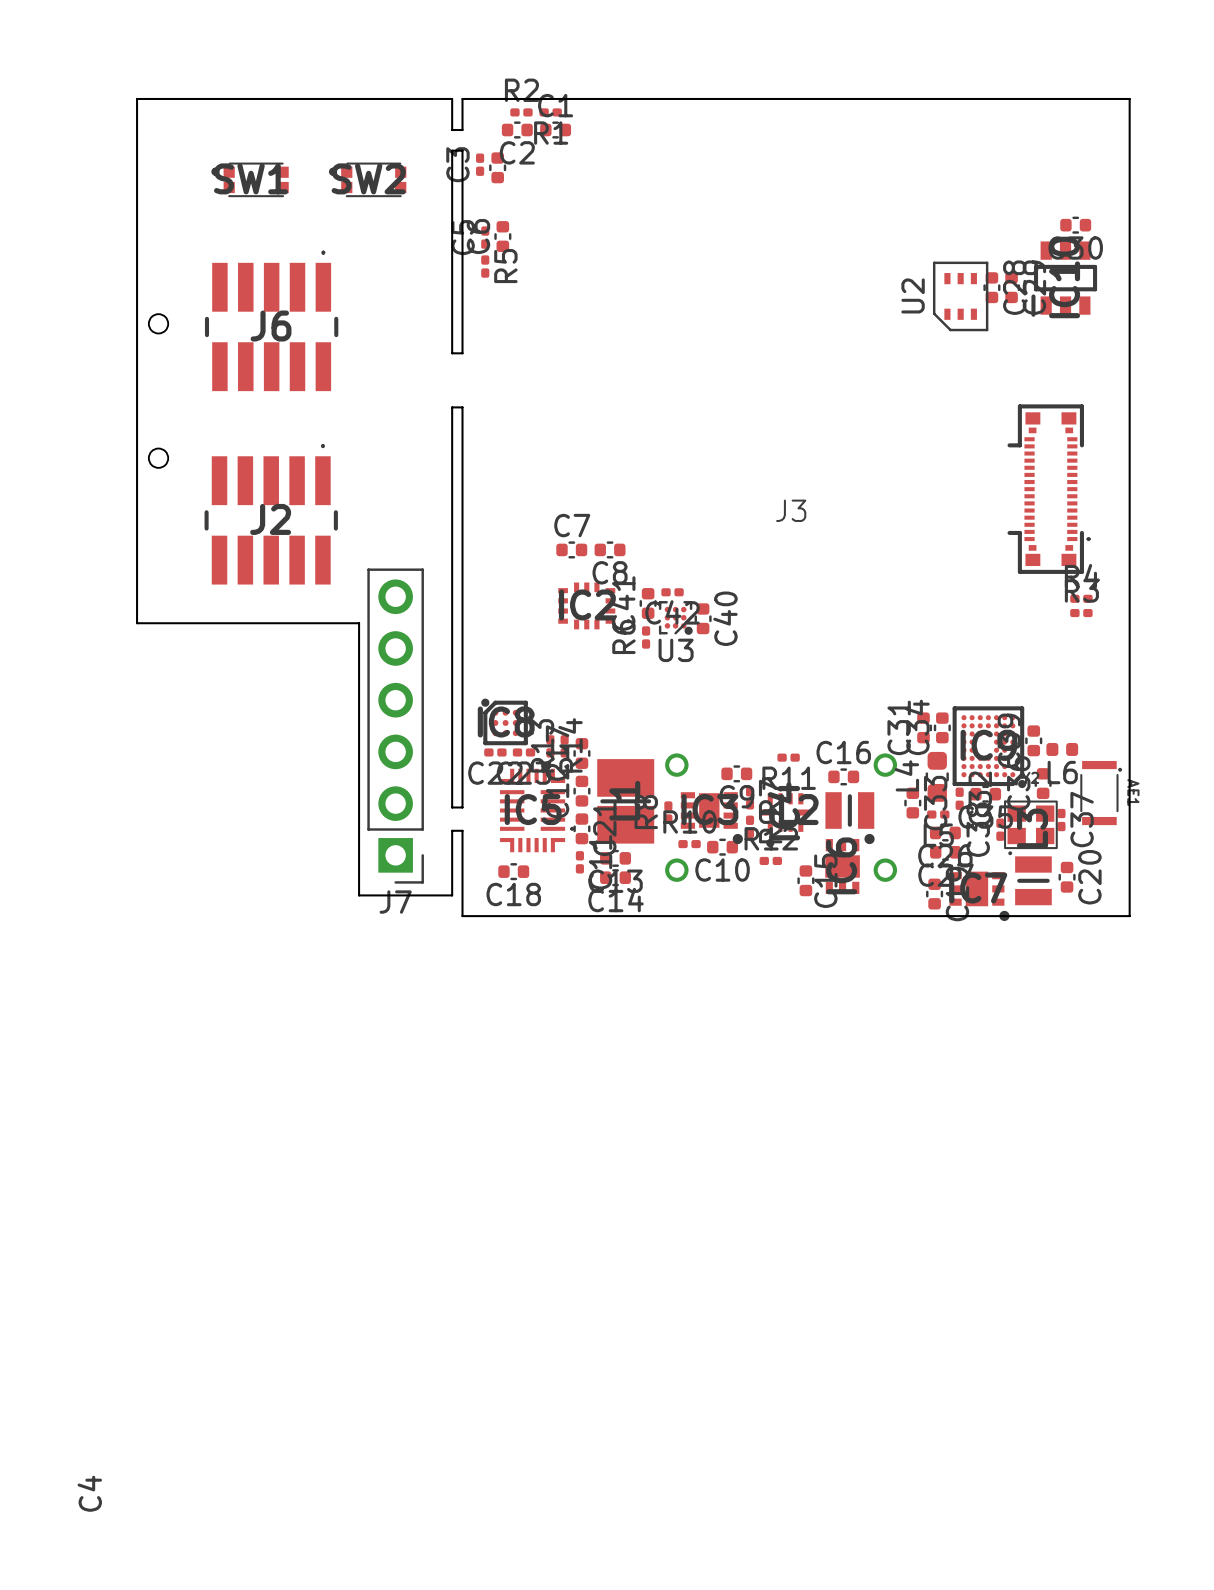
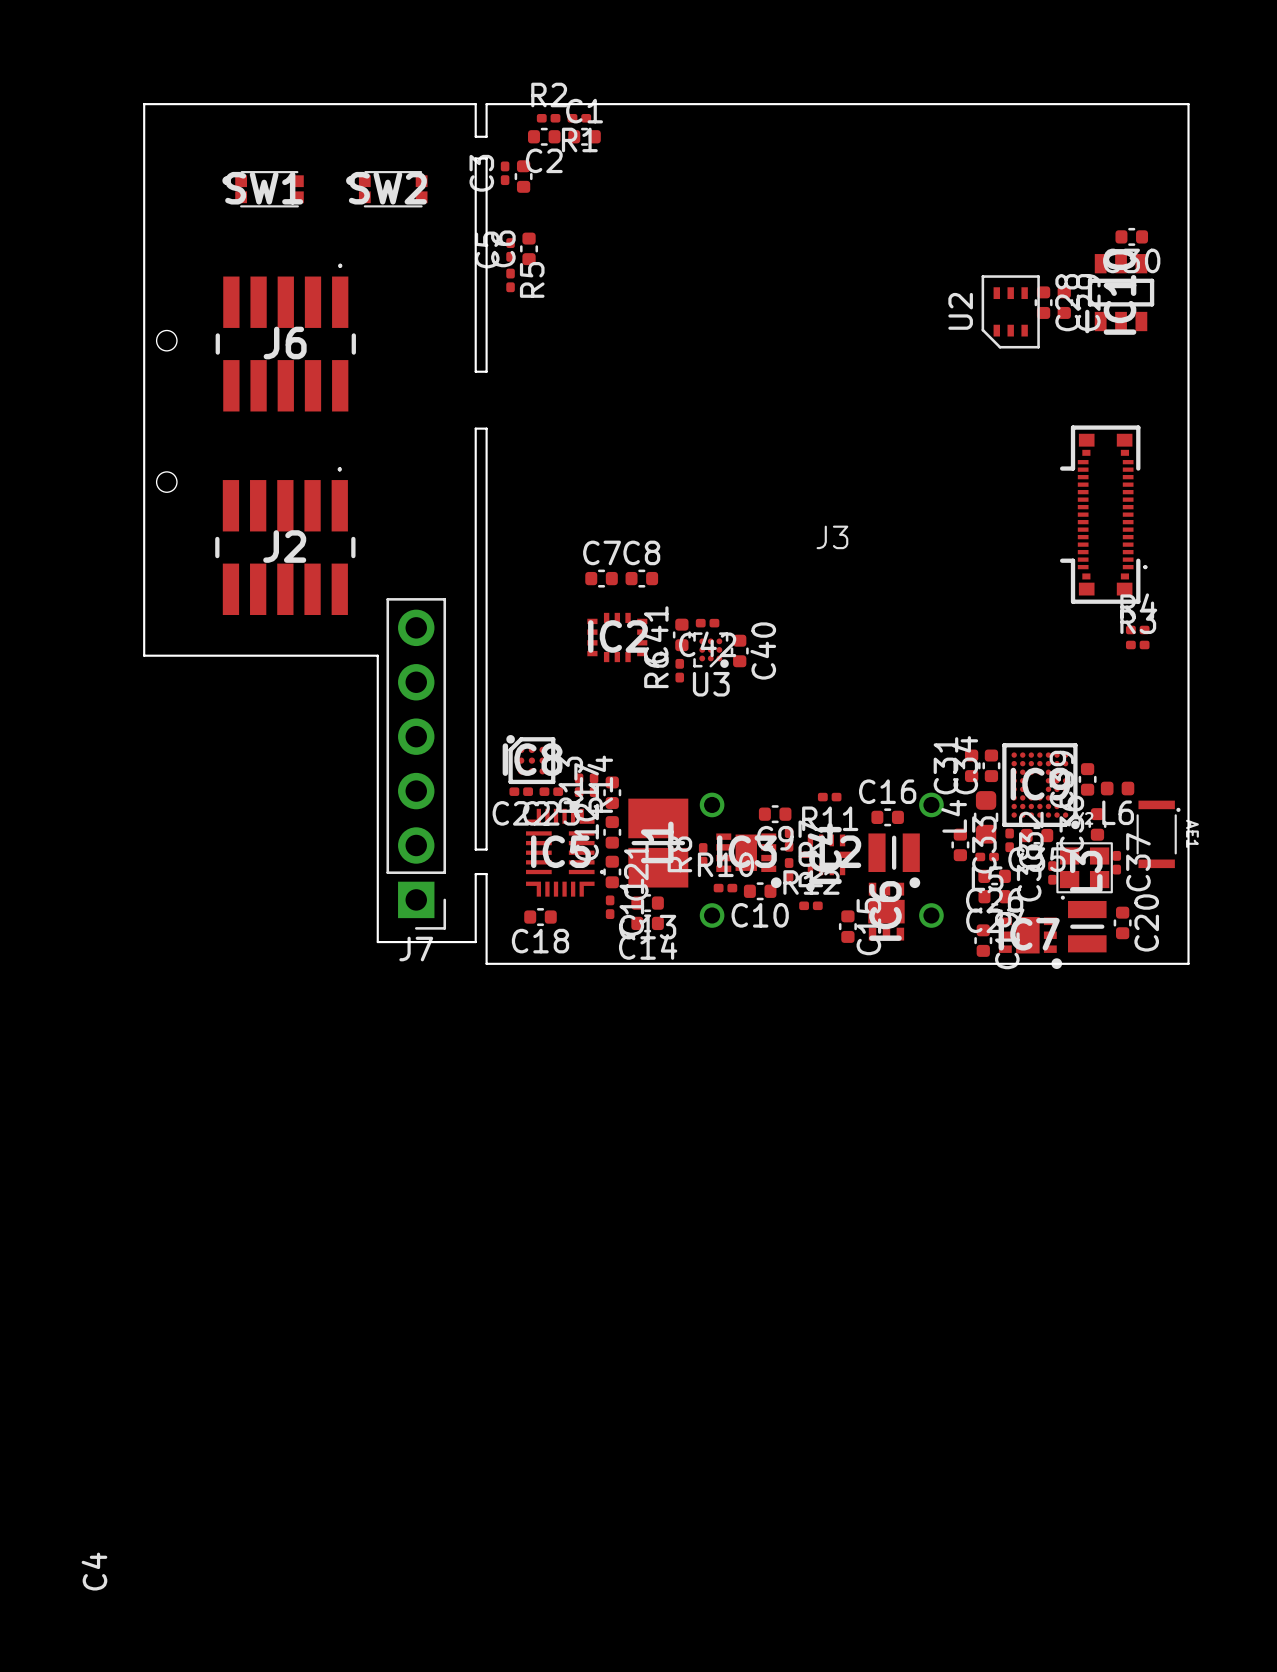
C8 name position: C8 (610, 572) -> C8 (641, 552)

